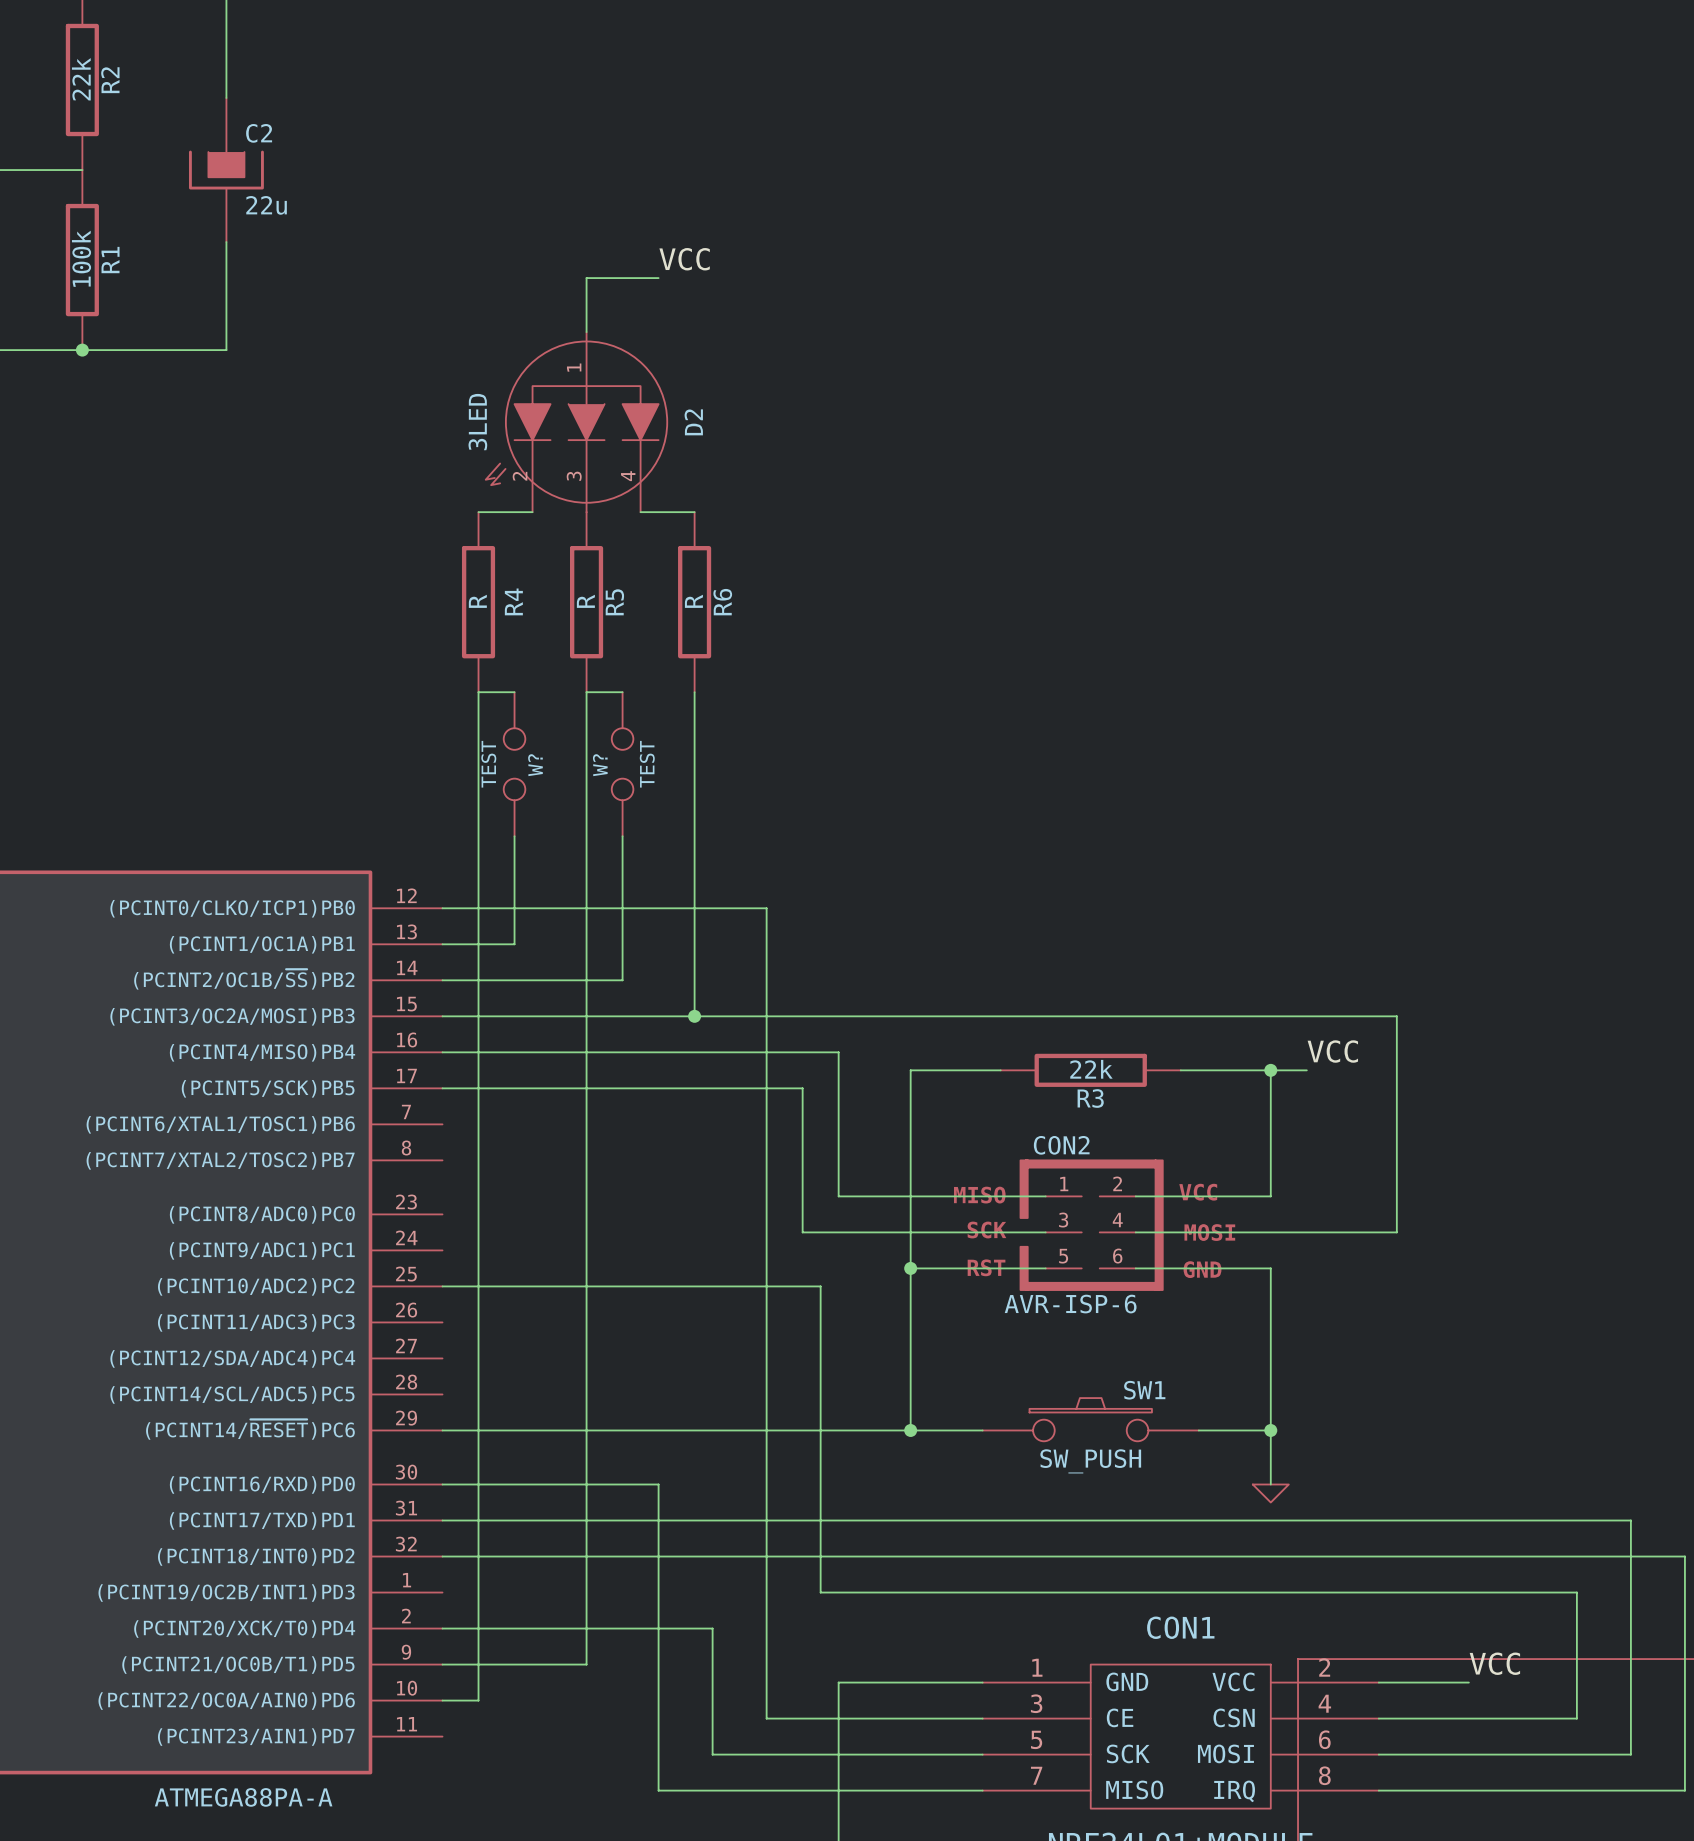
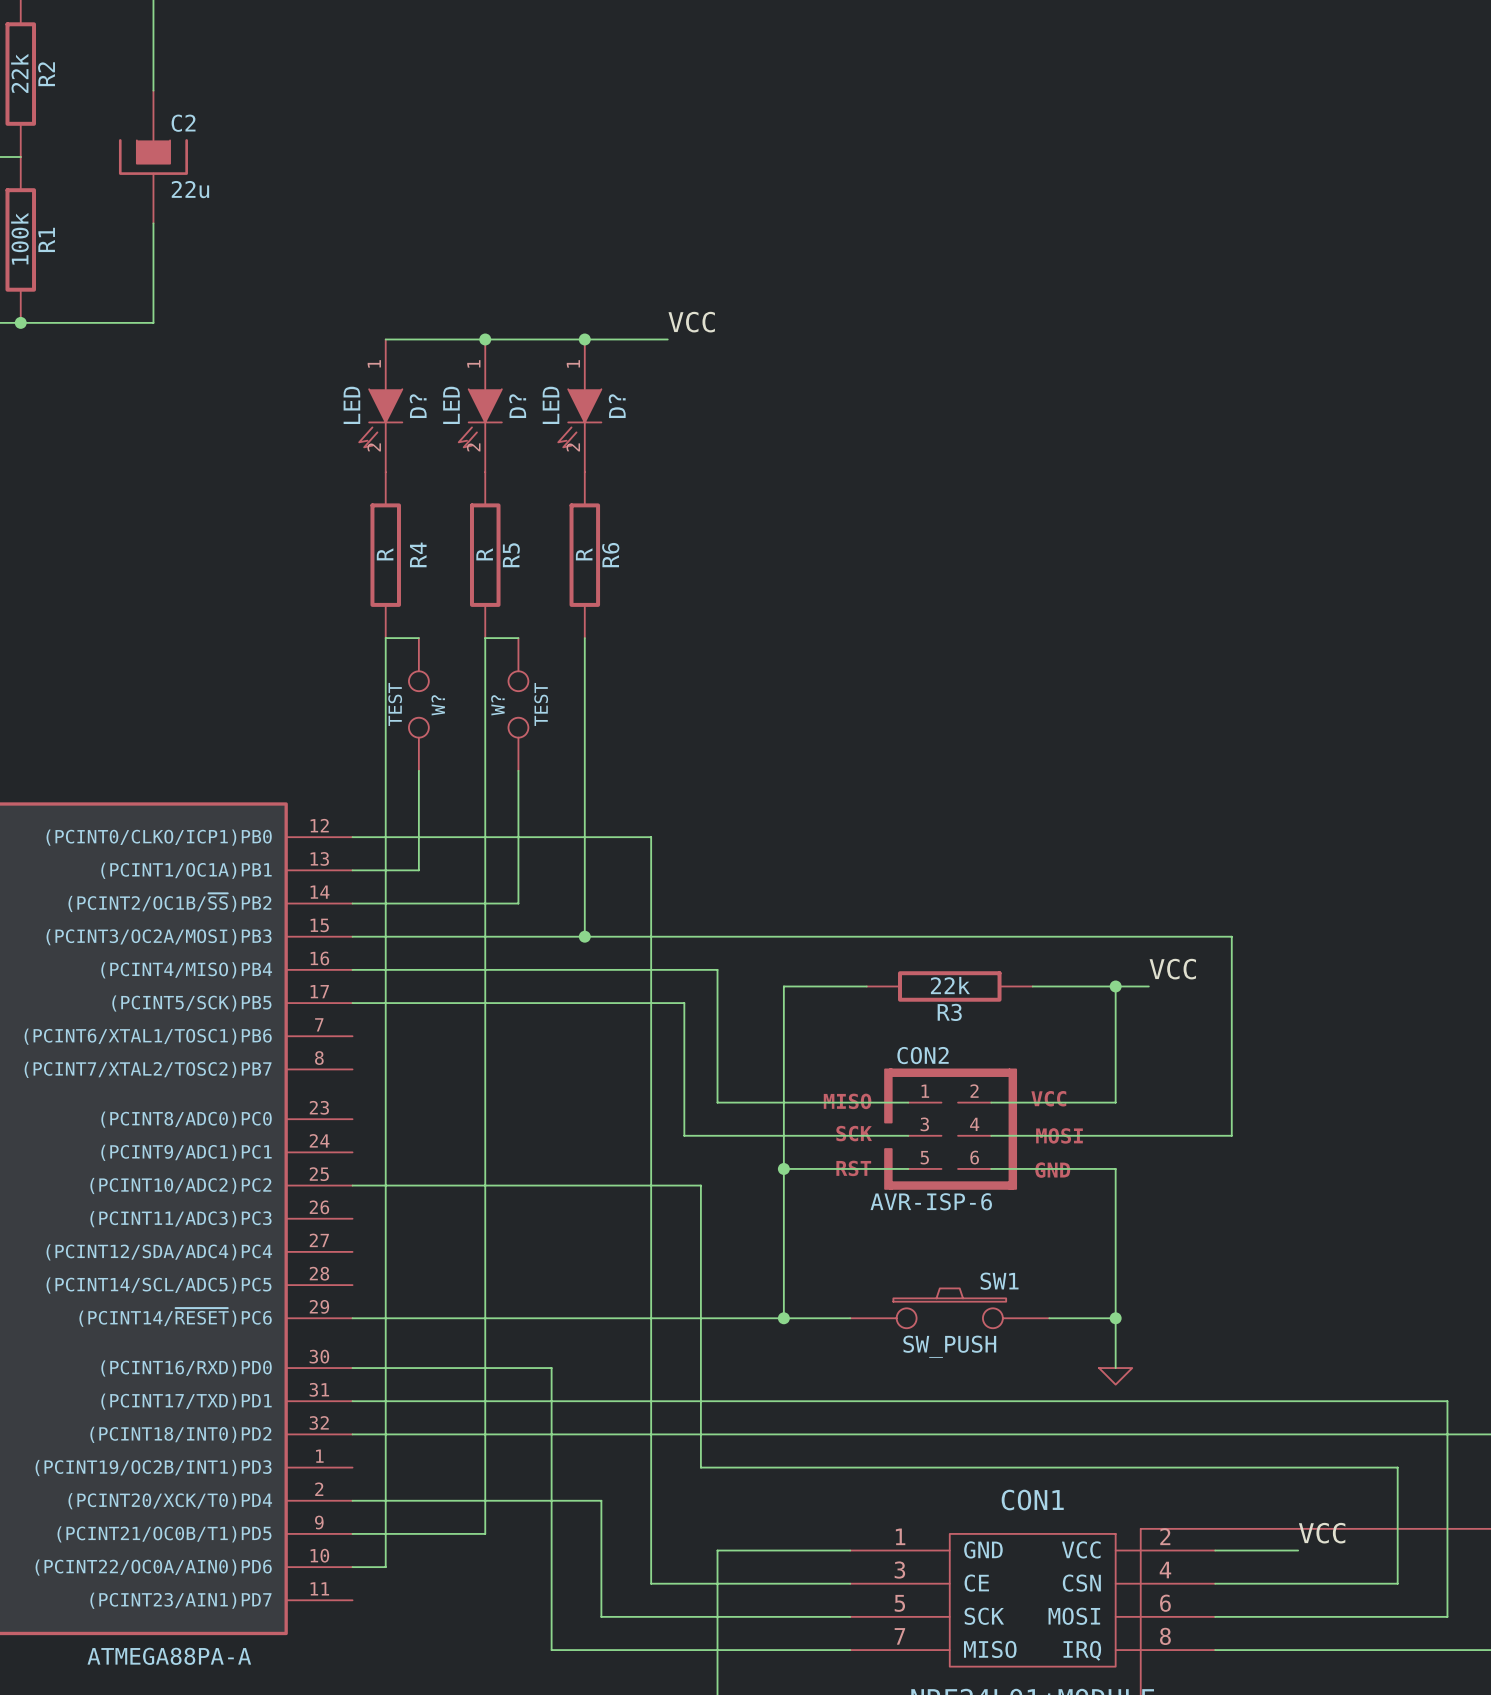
label position: VCC (684, 259) -> VCC (691, 322)
wire: (658, 278) (586, 278) (586, 332) -> none
wire: none -> (385, 339) (667, 339)
junction: none -> (485, 339)
junction: none -> (584, 339)
D2: 3LED (576, 422) -> none
D?: none -> LED (380, 405)
D?: none -> LED (480, 405)
D?: none -> LED (579, 405)
wire: (478, 512) (532, 512) -> none
wire: (640, 512) (694, 512) -> none

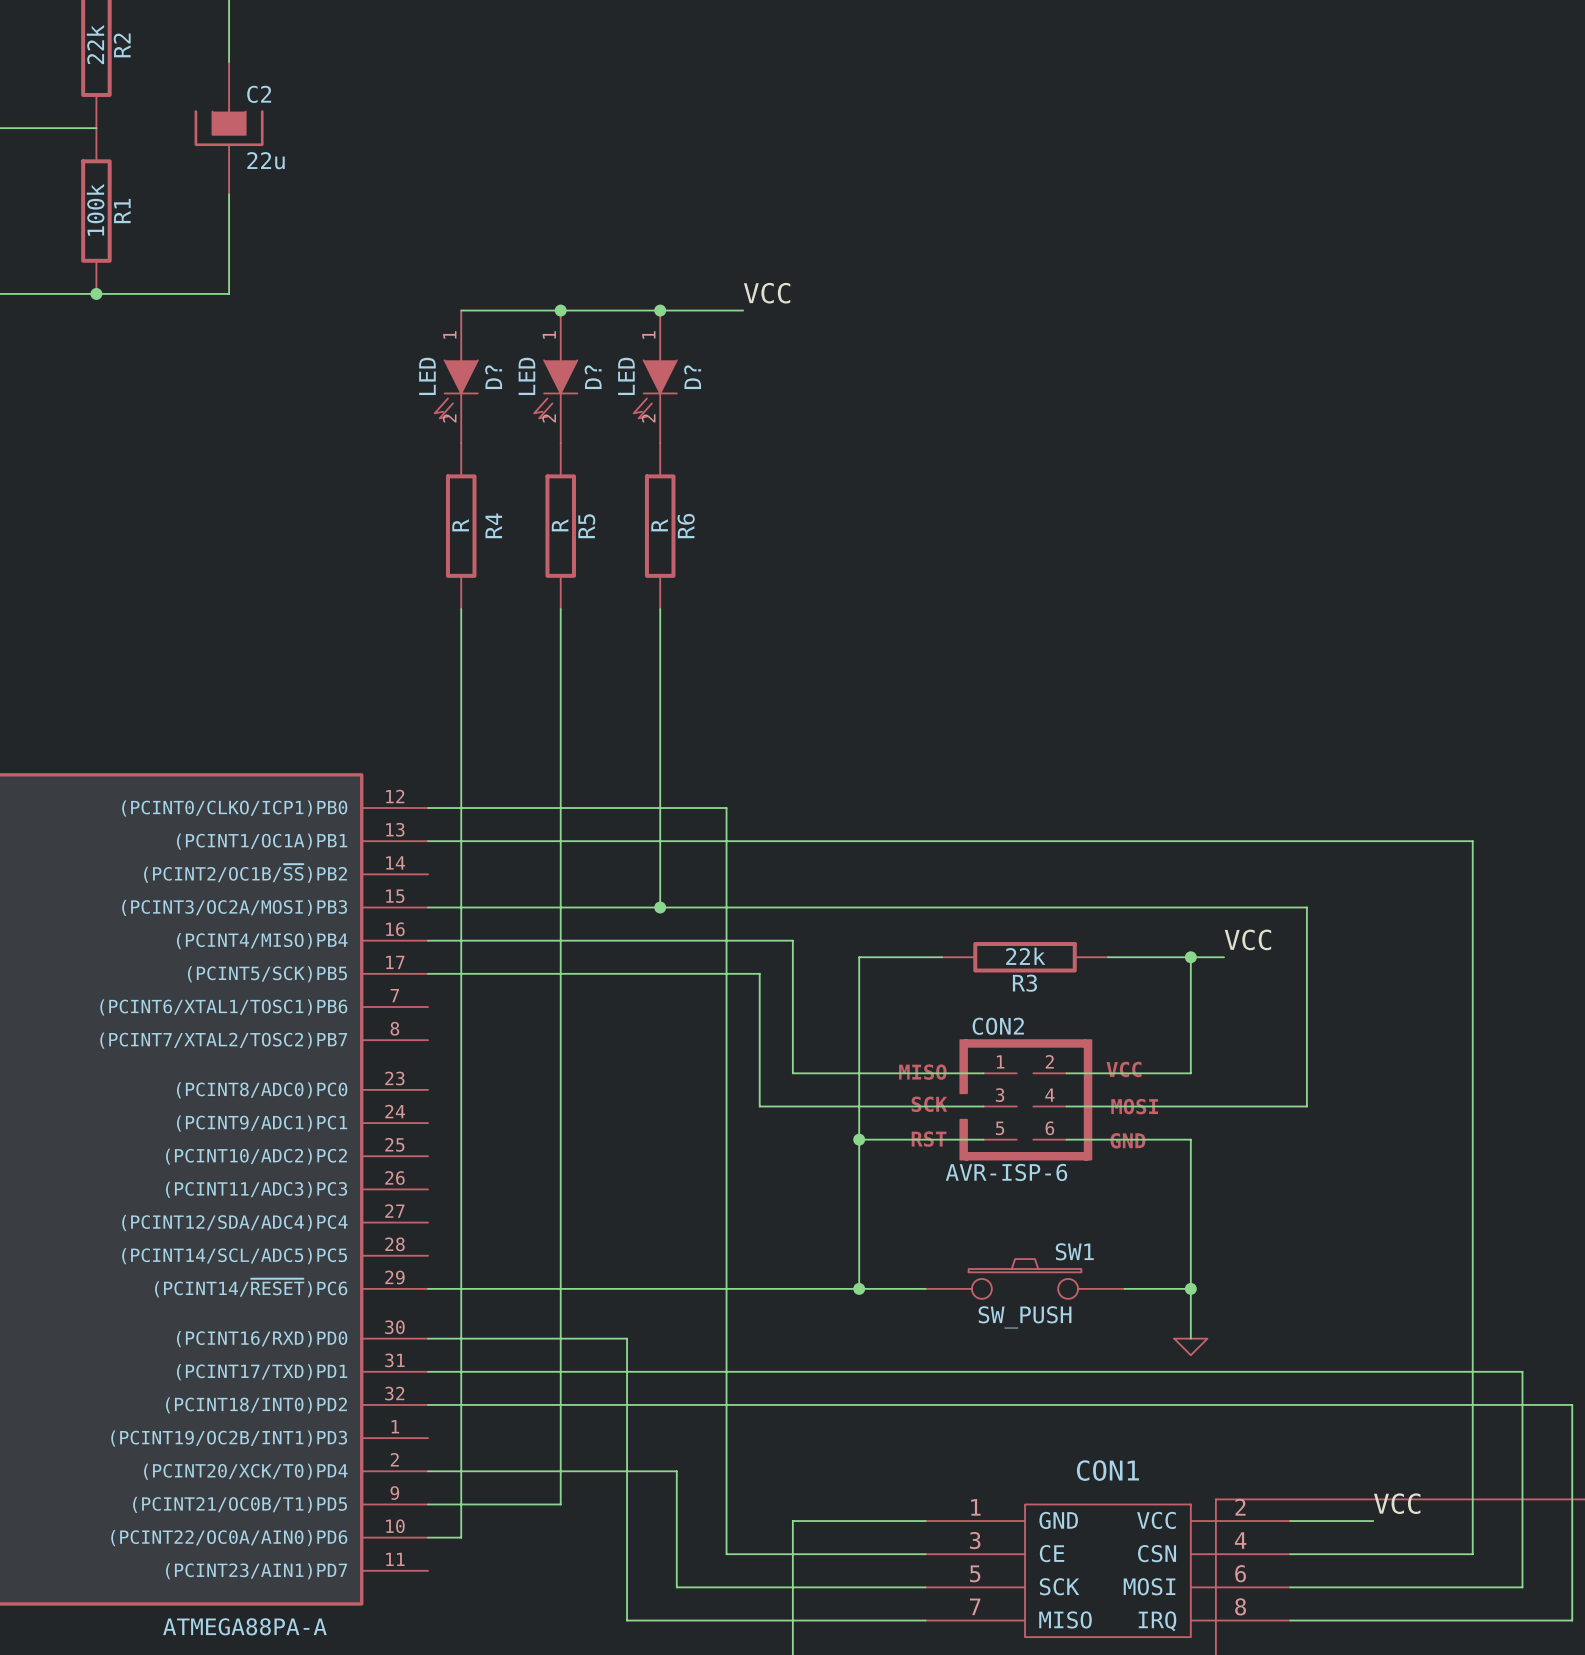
wire: (385, 638) (418, 638) -> none
wire: (485, 638) (518, 638) -> none
W?: TEST (418, 704) -> none
W?: TEST (518, 704) -> none
wire: (418, 770) (418, 870) -> none
wire: (518, 770) (518, 903) (352, 903) -> none
wire: (352, 1185) (700, 1185) (700, 1467) (1397, 1467) -> (494, 841) (1472, 841) (1472, 1438)

